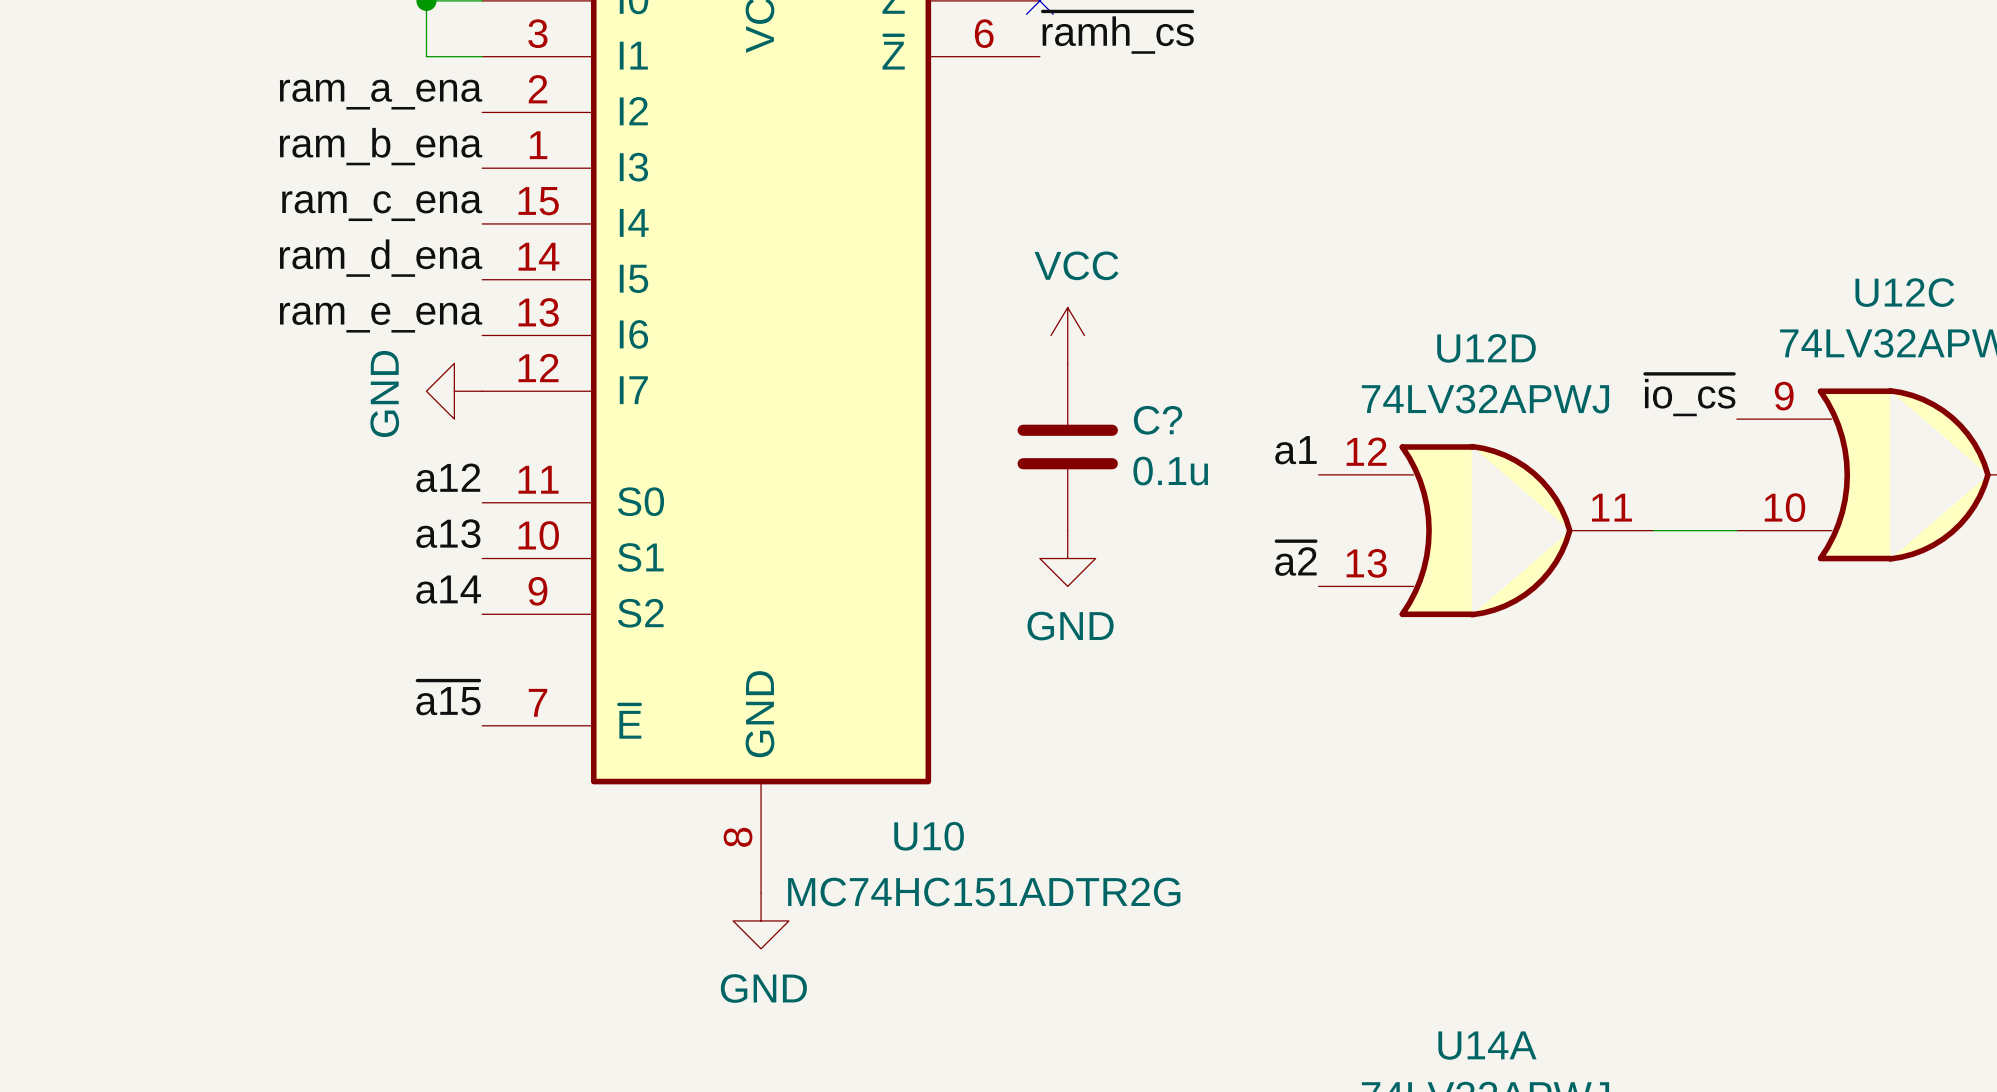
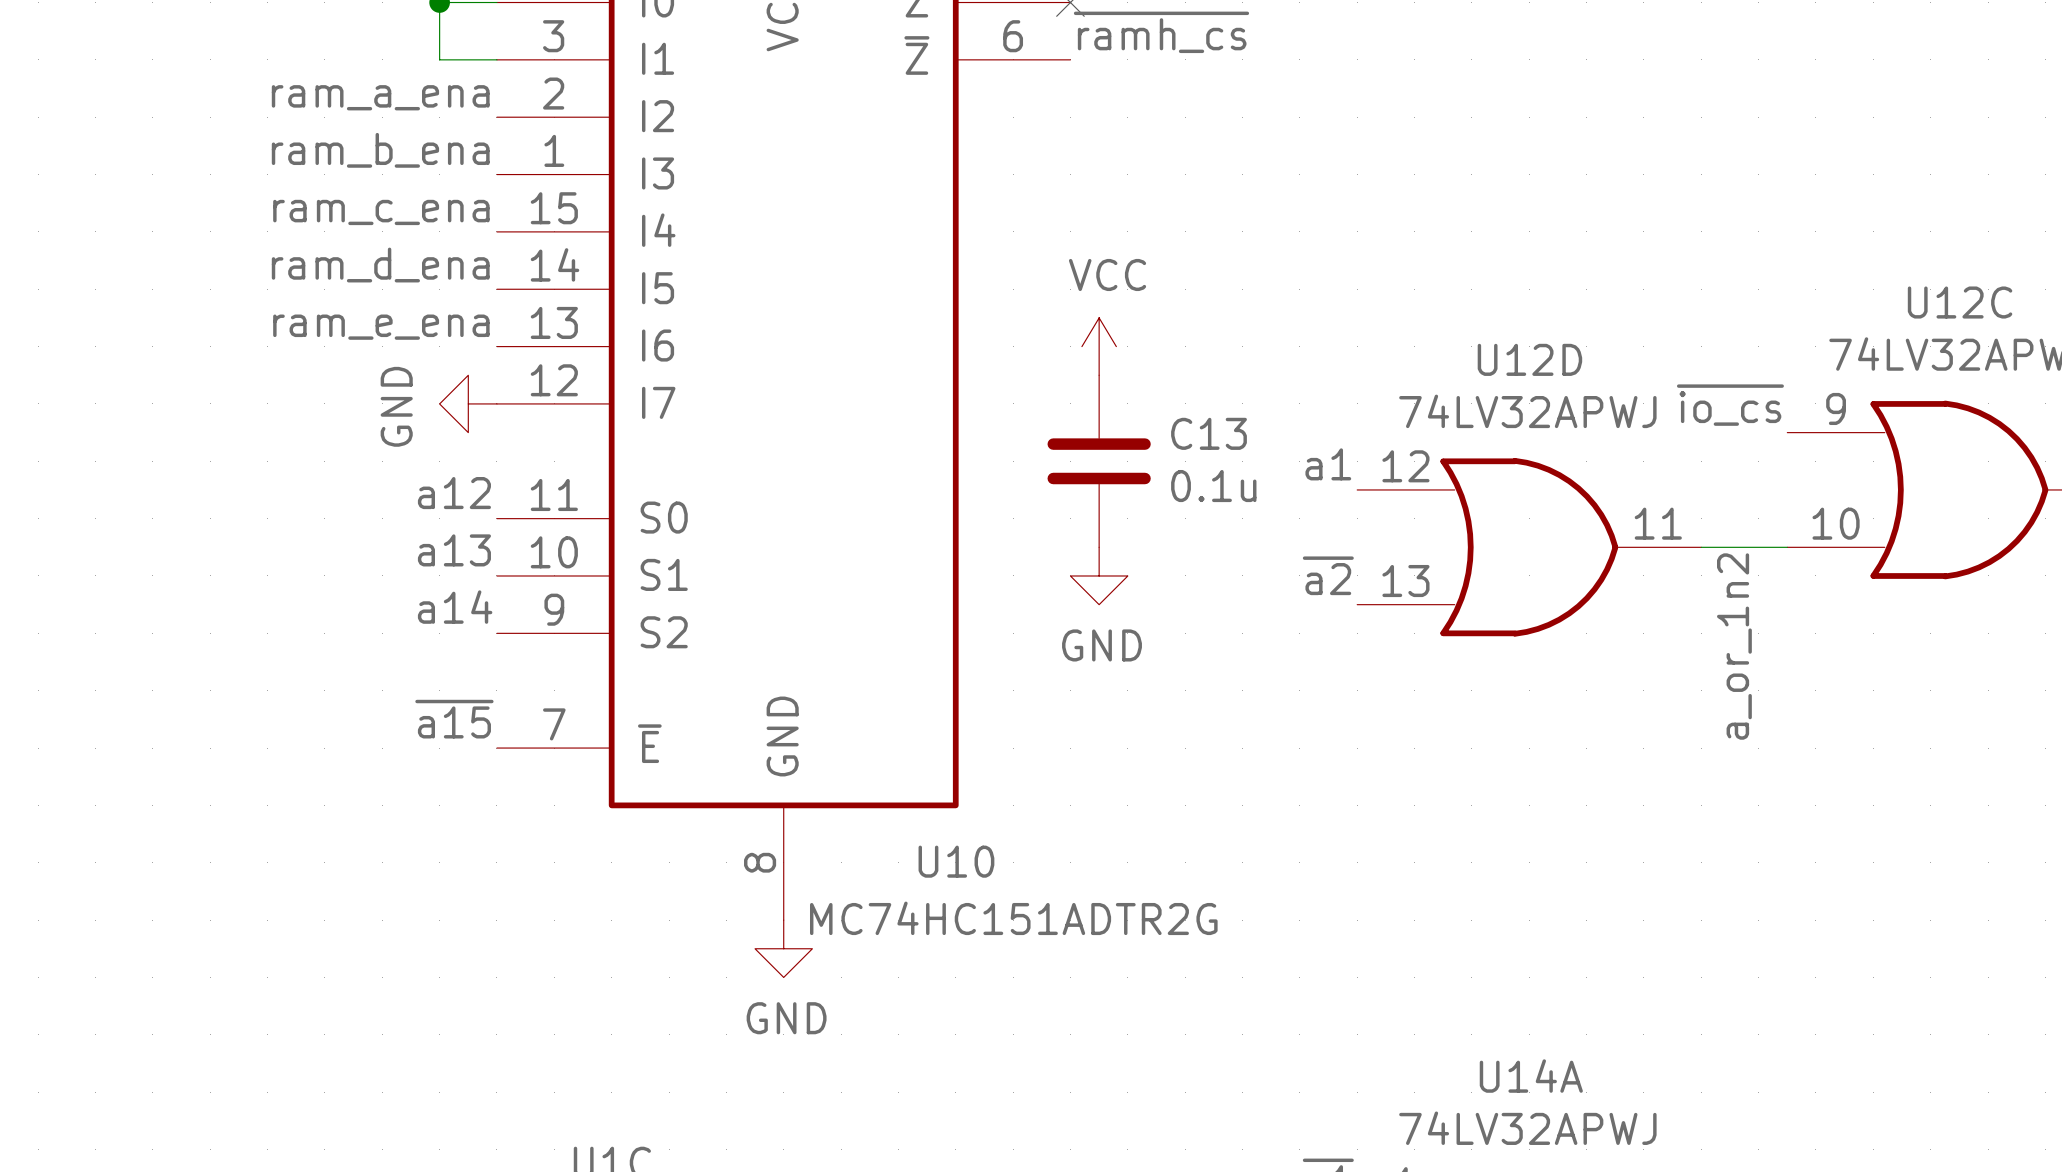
C? name: C? (1158, 420) -> C13 (1209, 433)
label: none -> a_or_1n2 (1734, 646)

